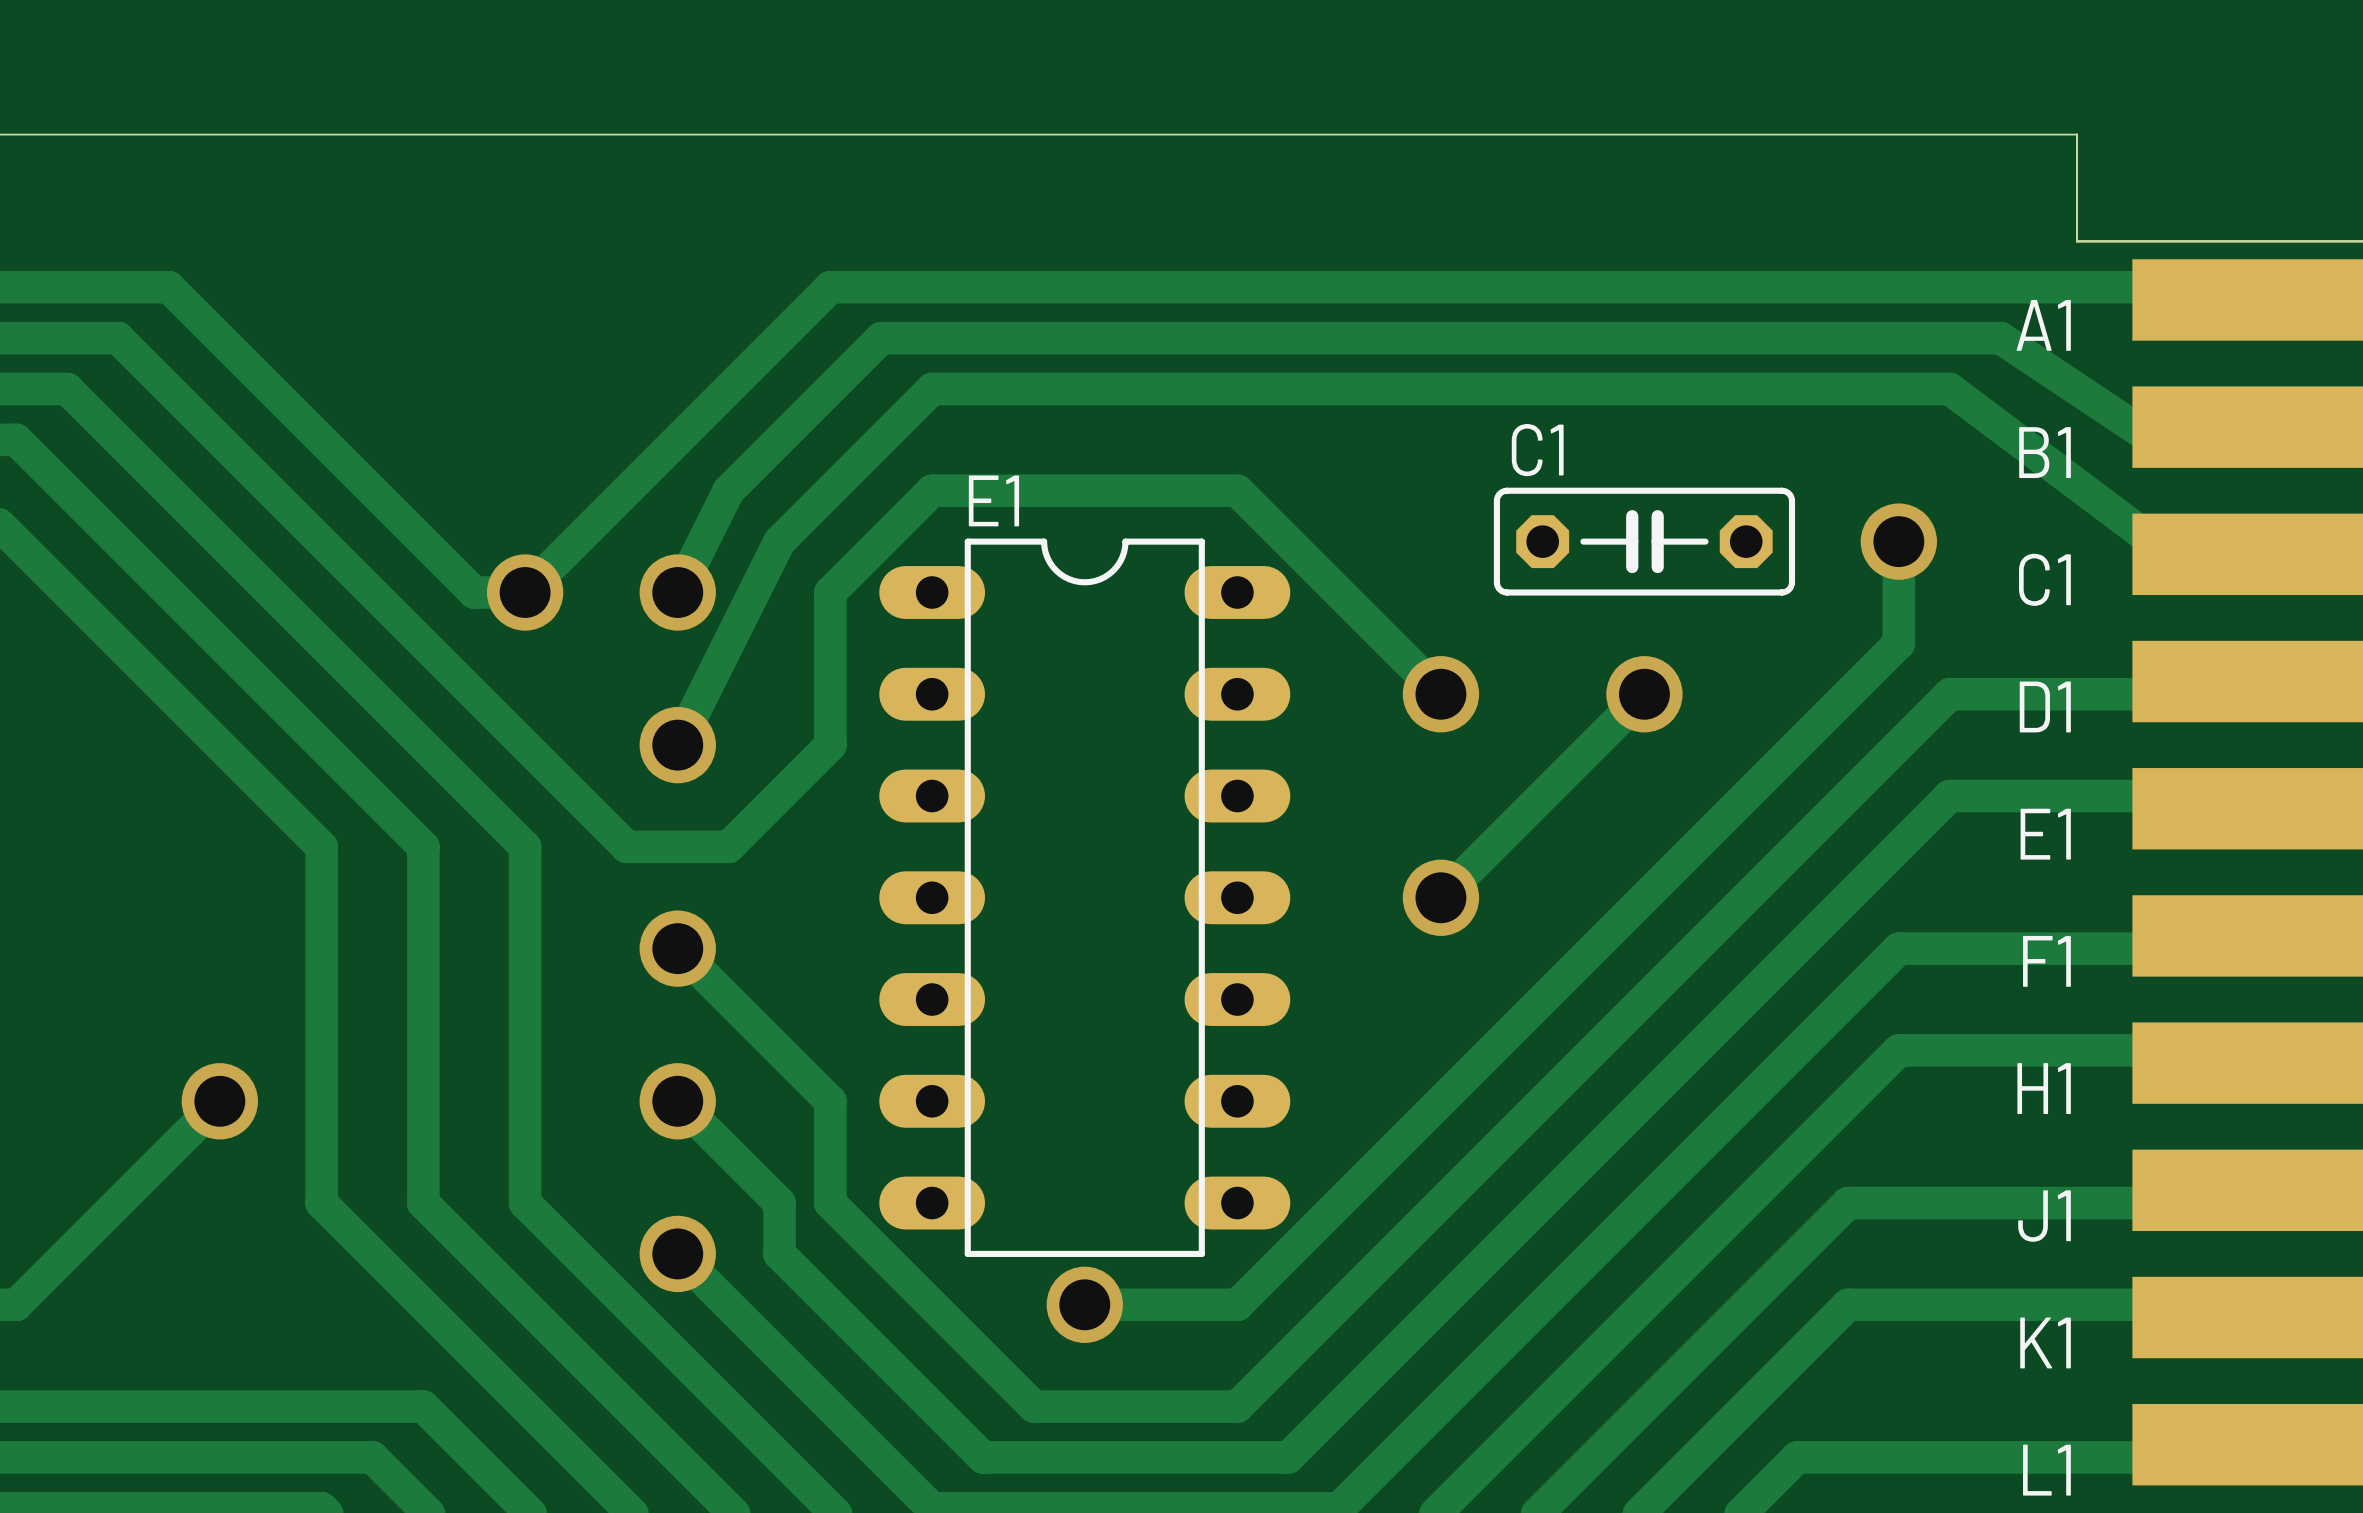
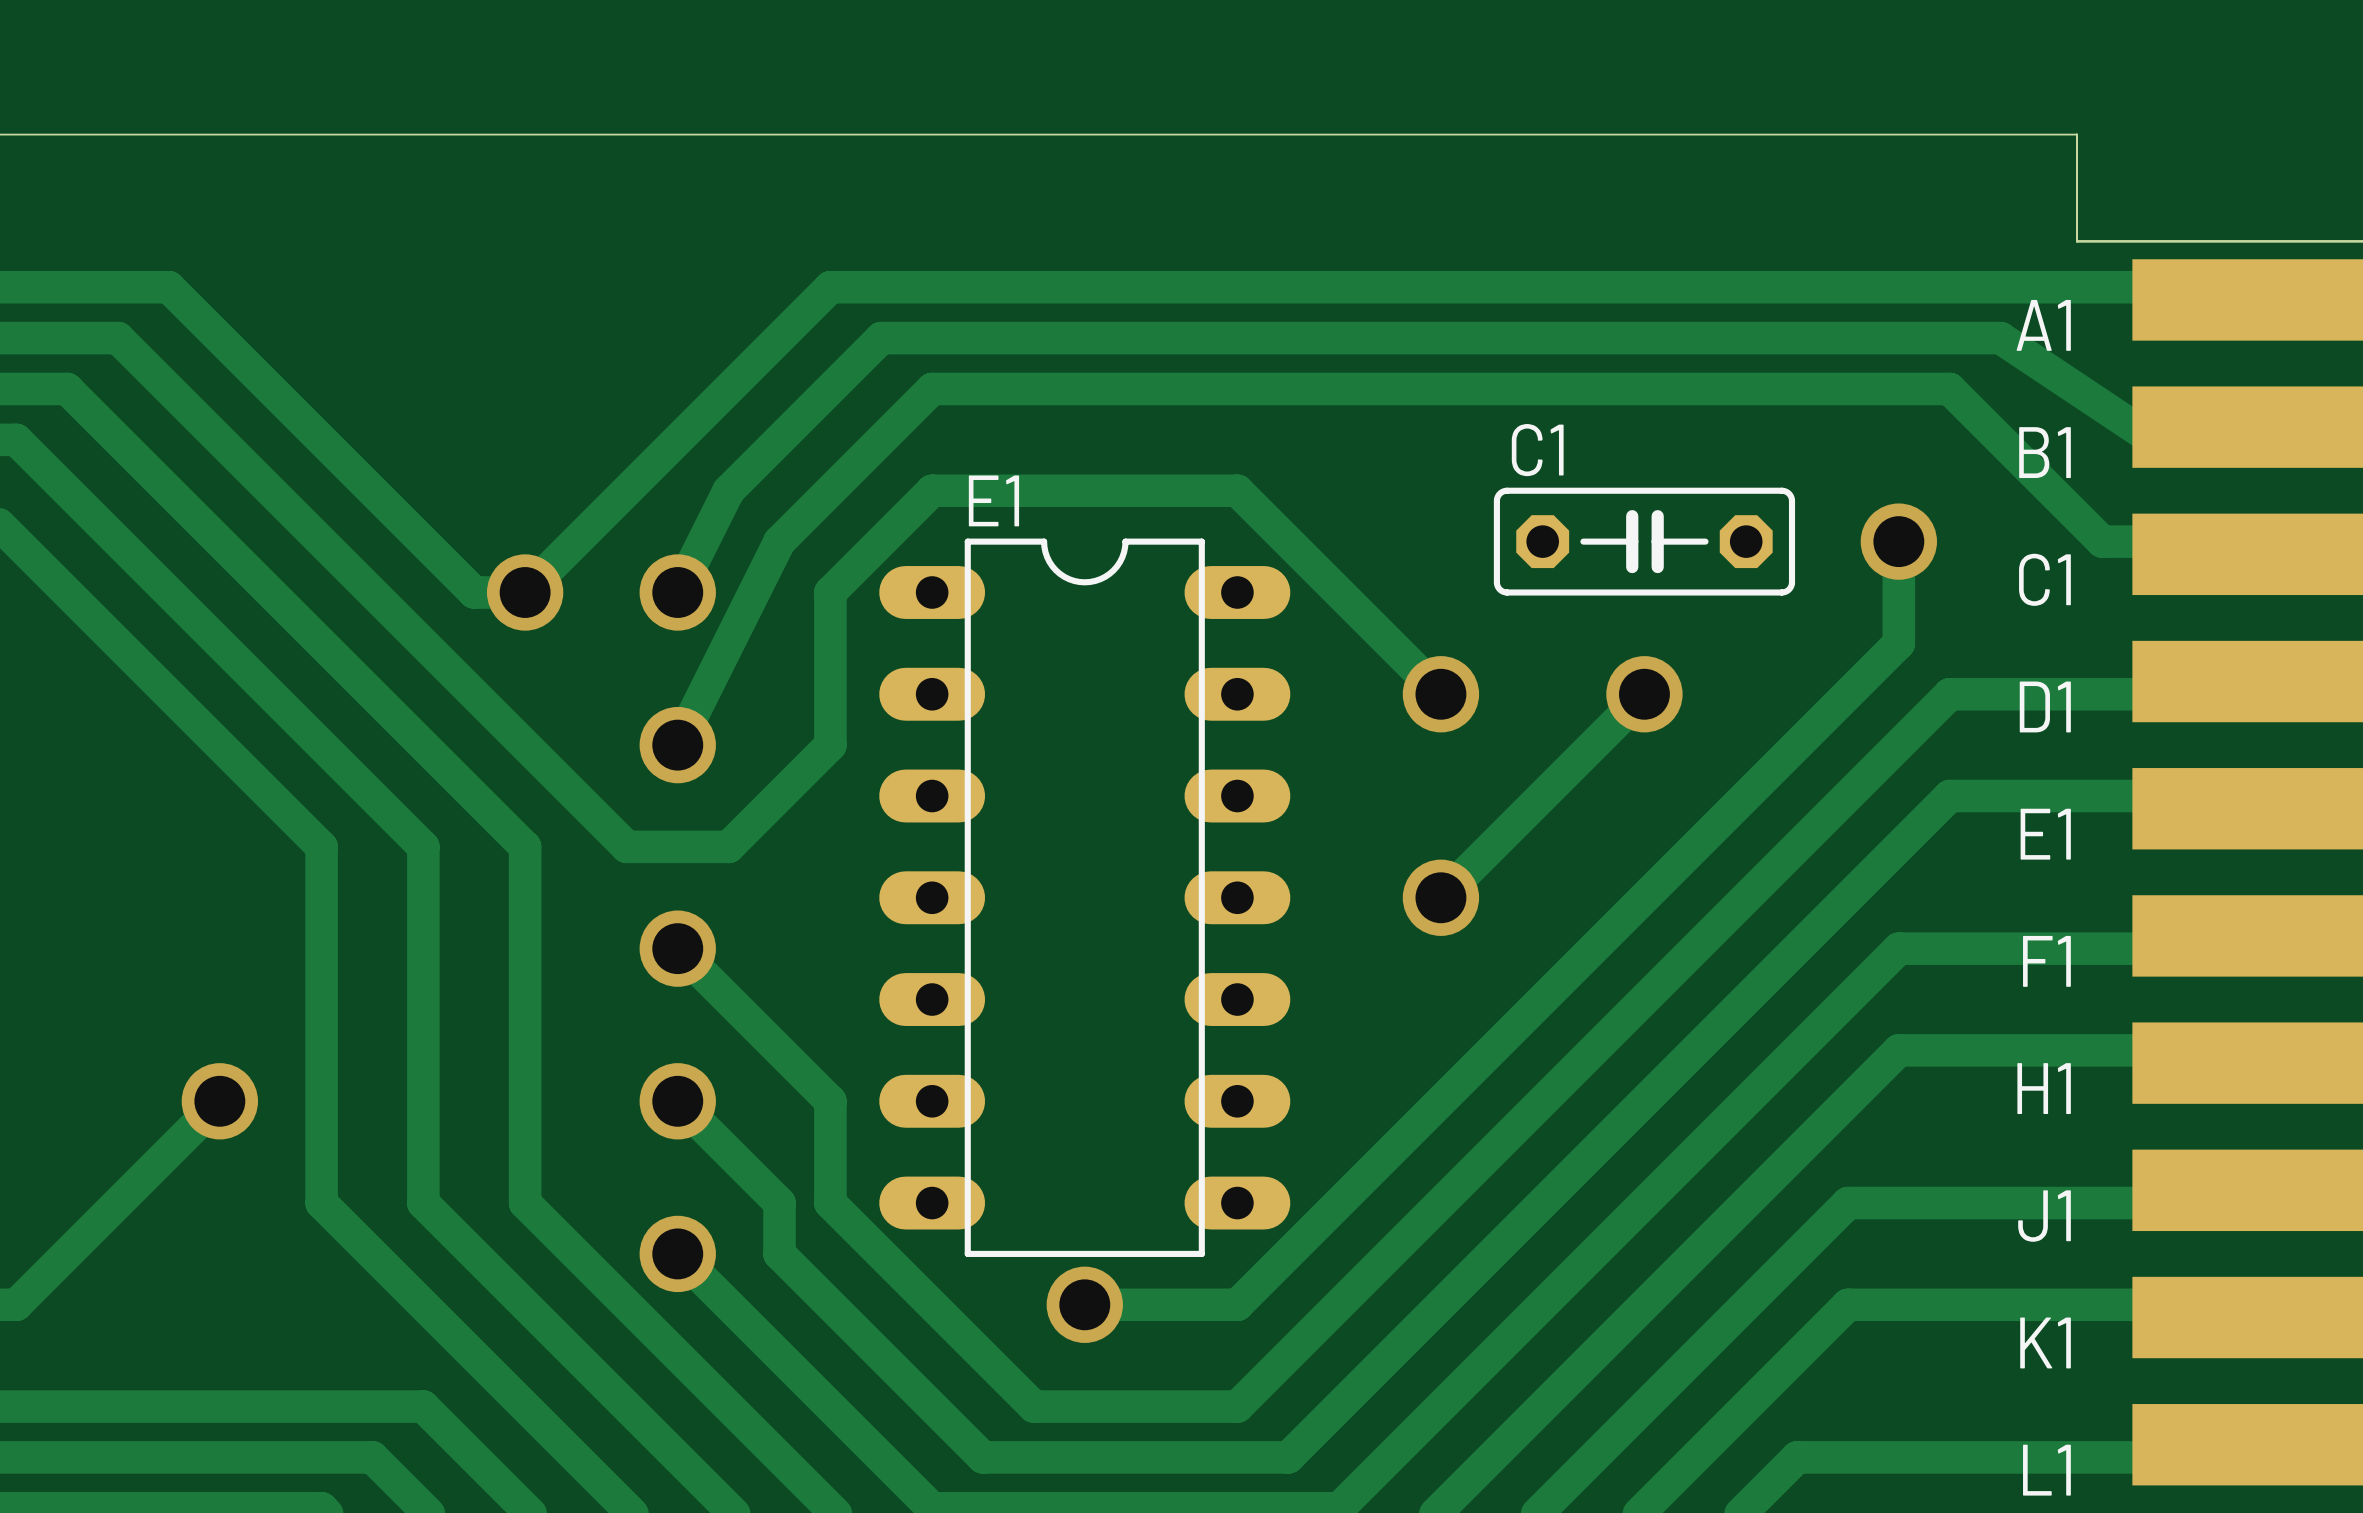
track: (1949, 388) (2153, 541) -> (1949, 388) (2102, 541) (2153, 541)

